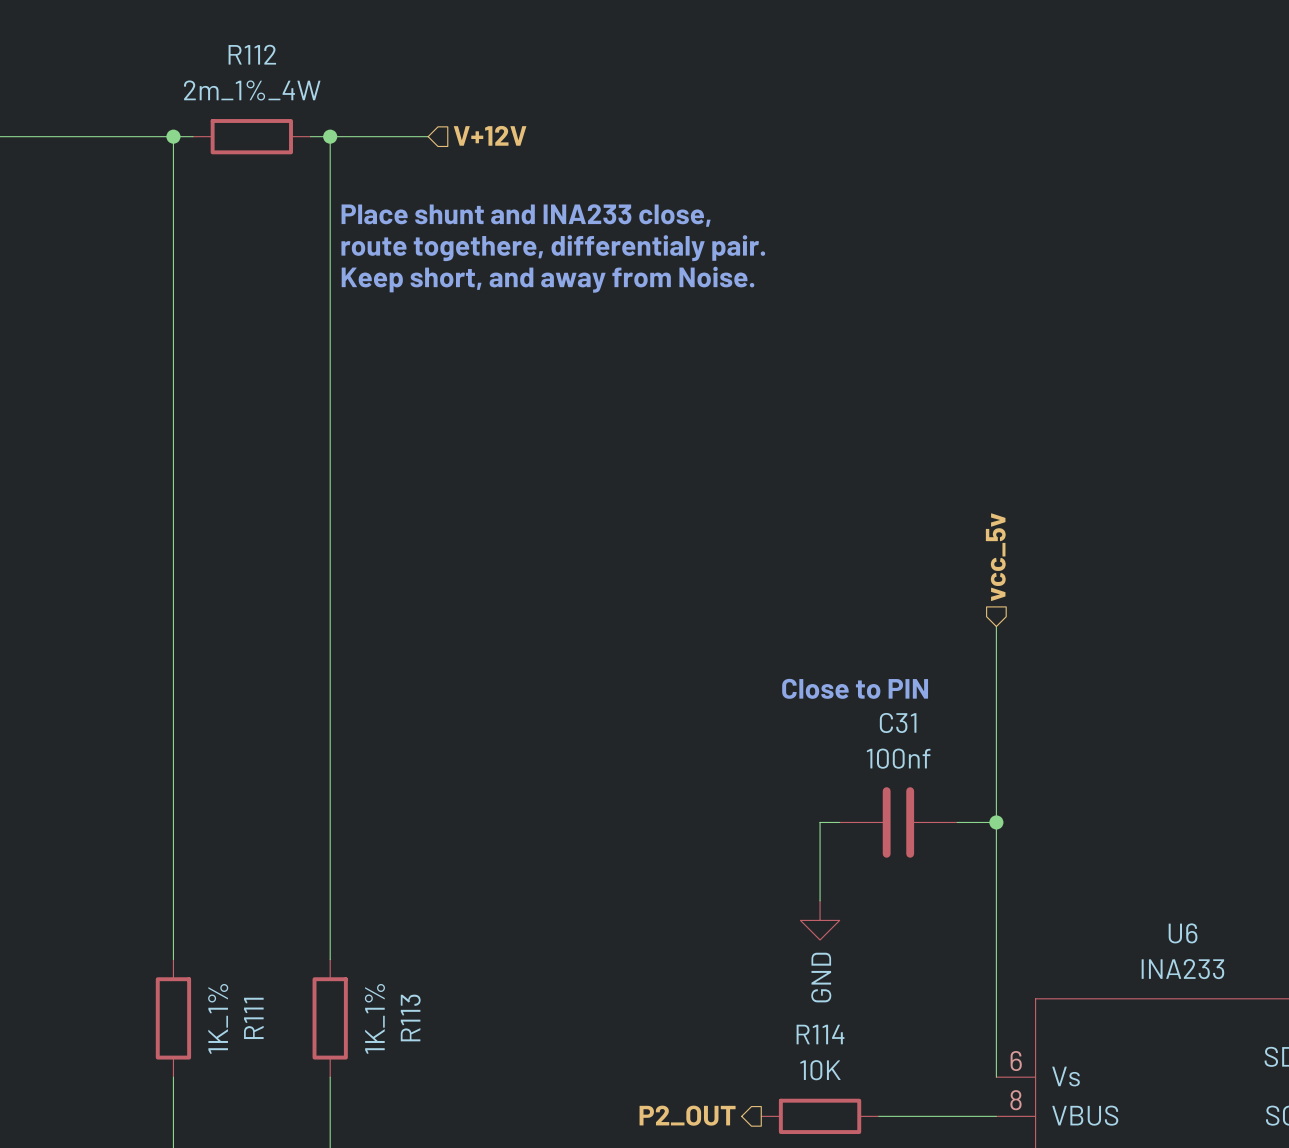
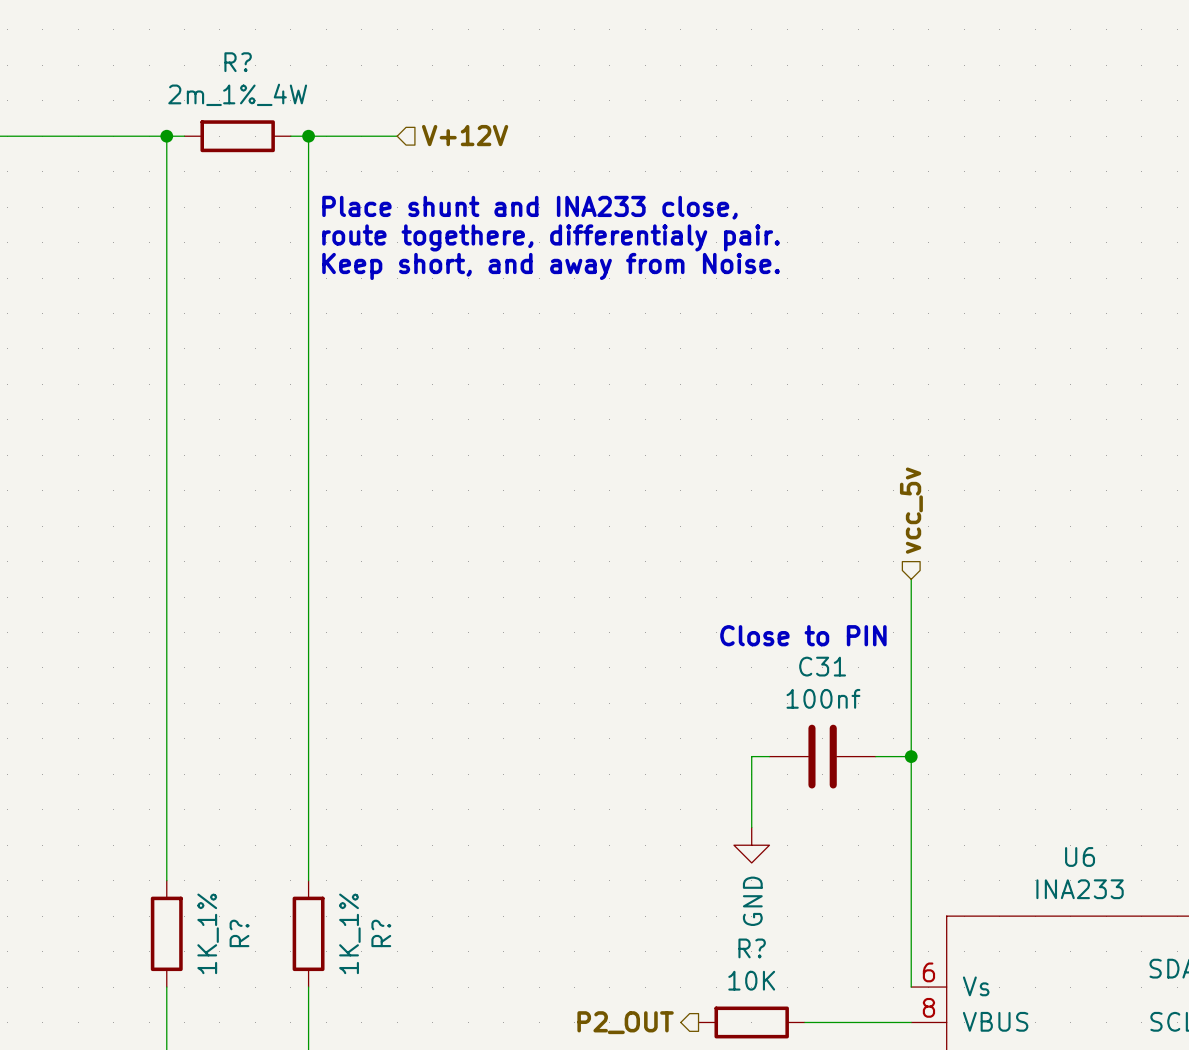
R112 name: R112 (252, 54) -> R? (238, 62)
R113 name: R113 (410, 1017) -> R? (381, 933)
R111 name: R111 (253, 1018) -> R? (239, 933)
R114 name: R114 (820, 1034) -> R? (752, 948)

